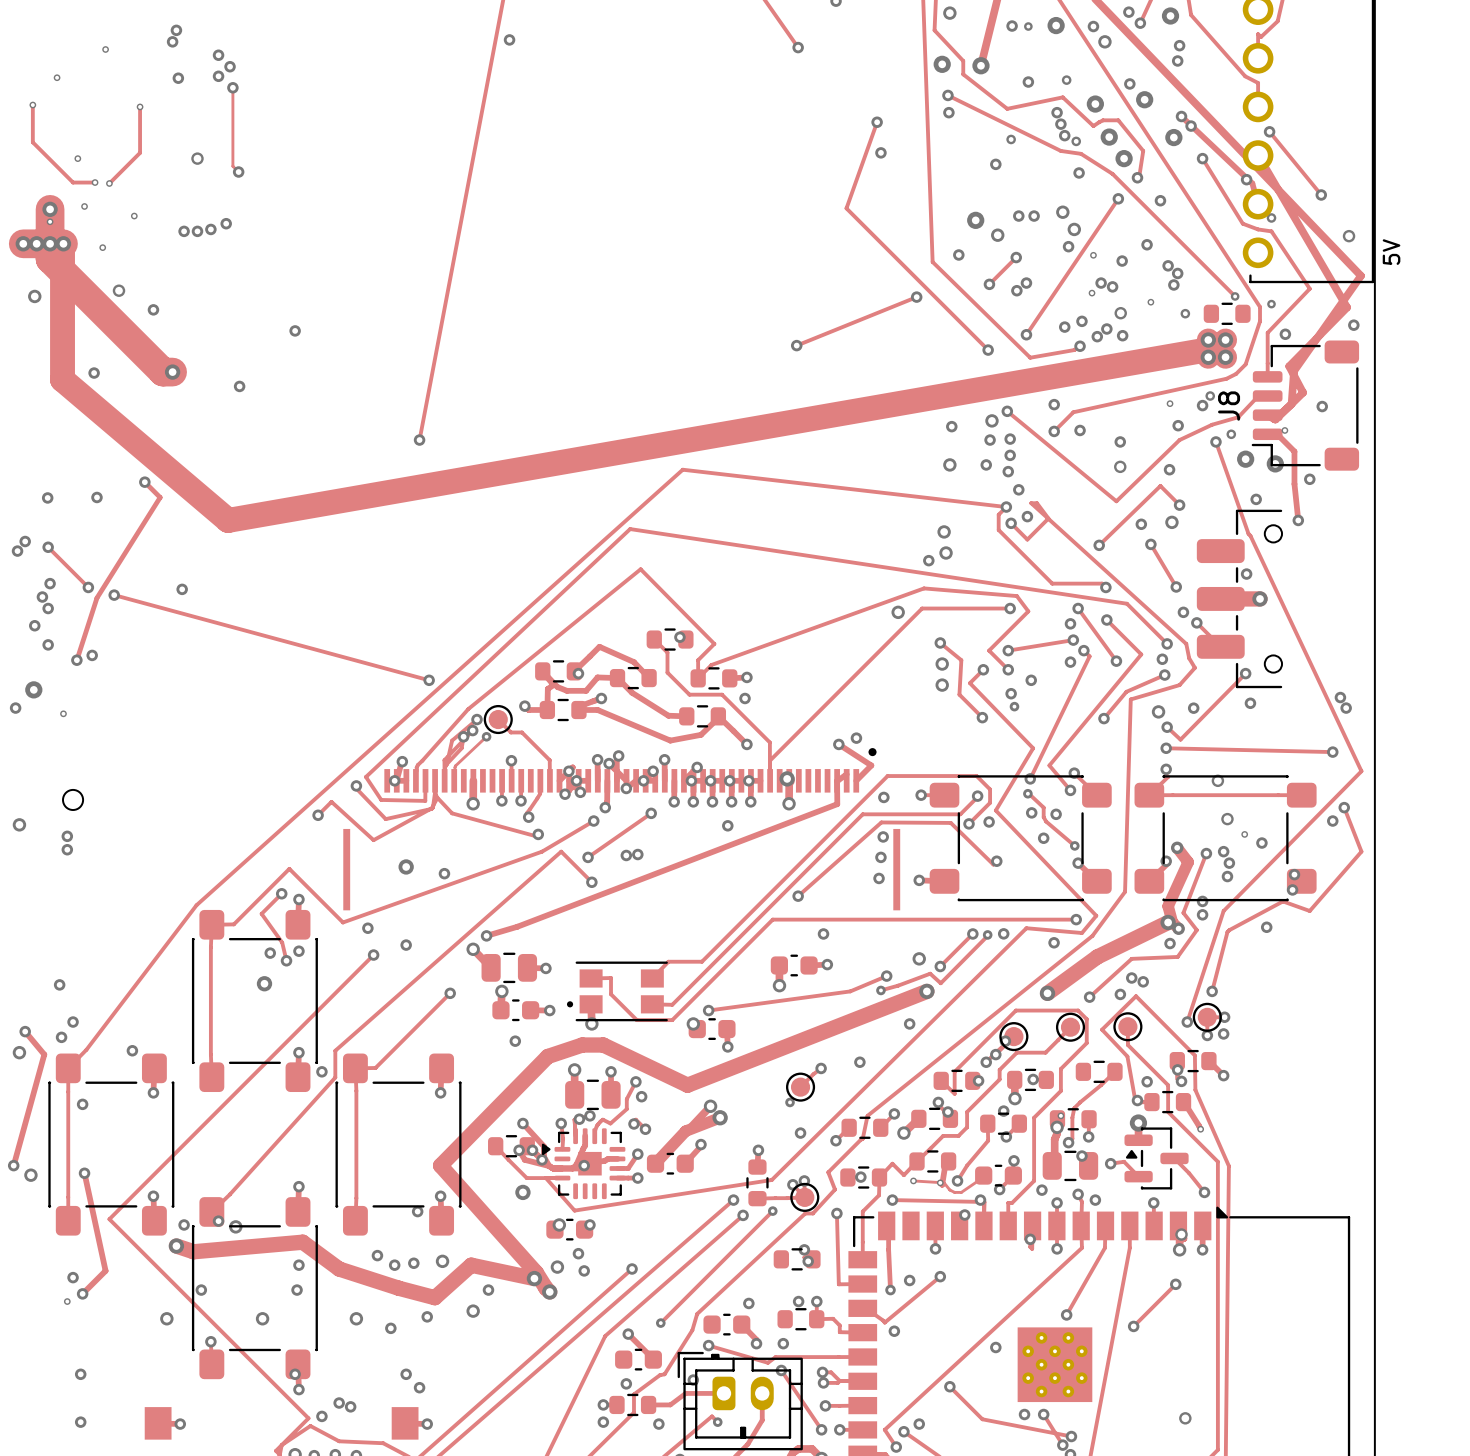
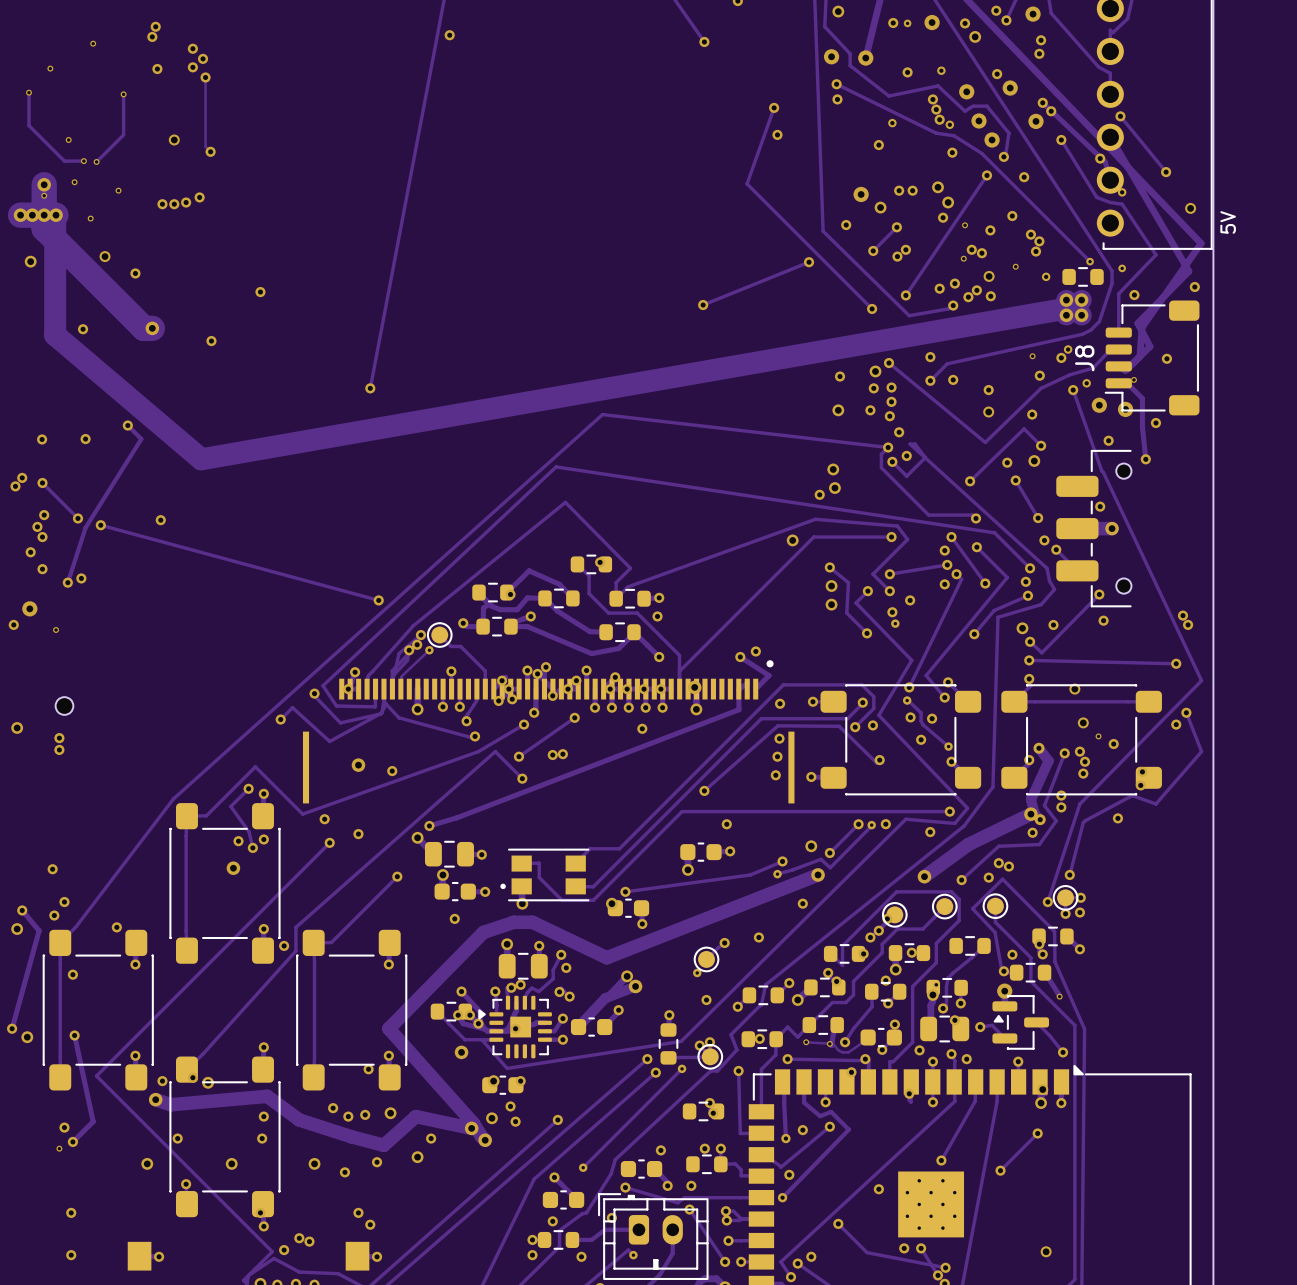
track: none -> (804, 1081) (804, 1102) (820, 1116) (831, 1111) (848, 1129) (782, 1197)
via: none -> (782, 1197)

